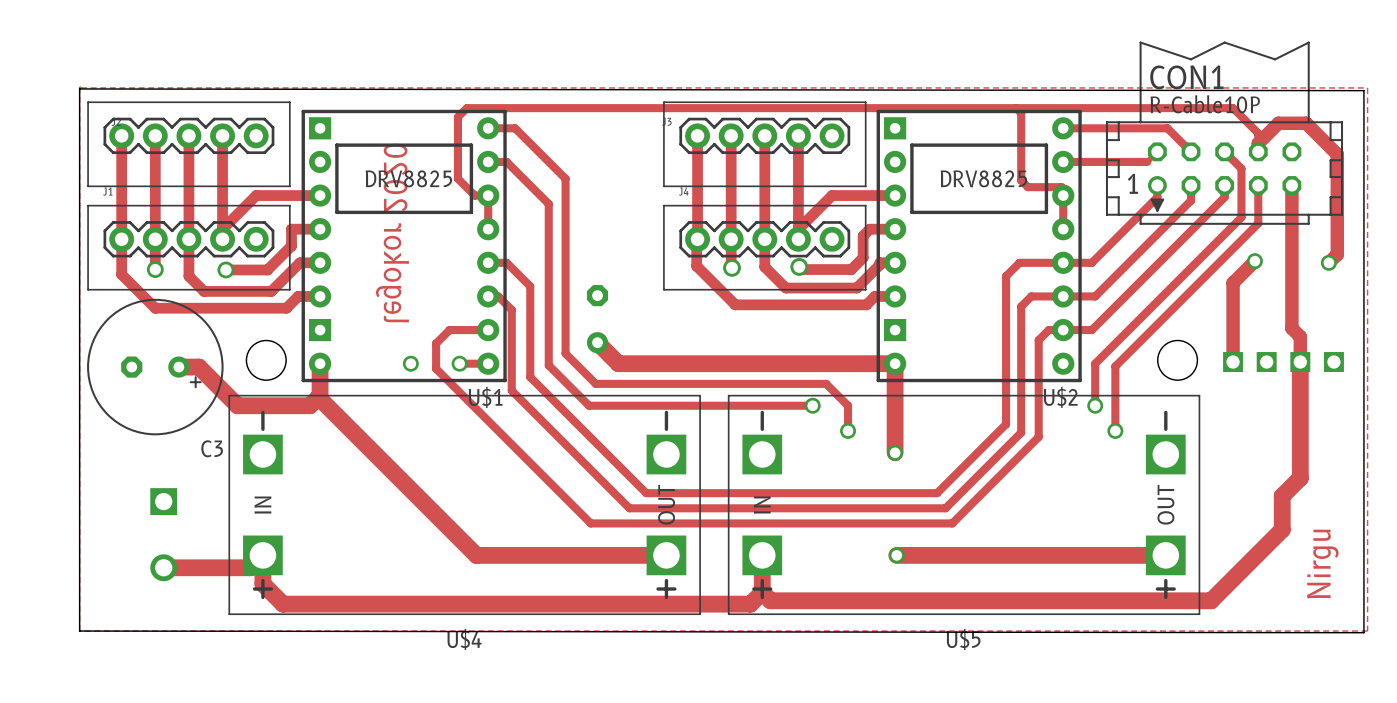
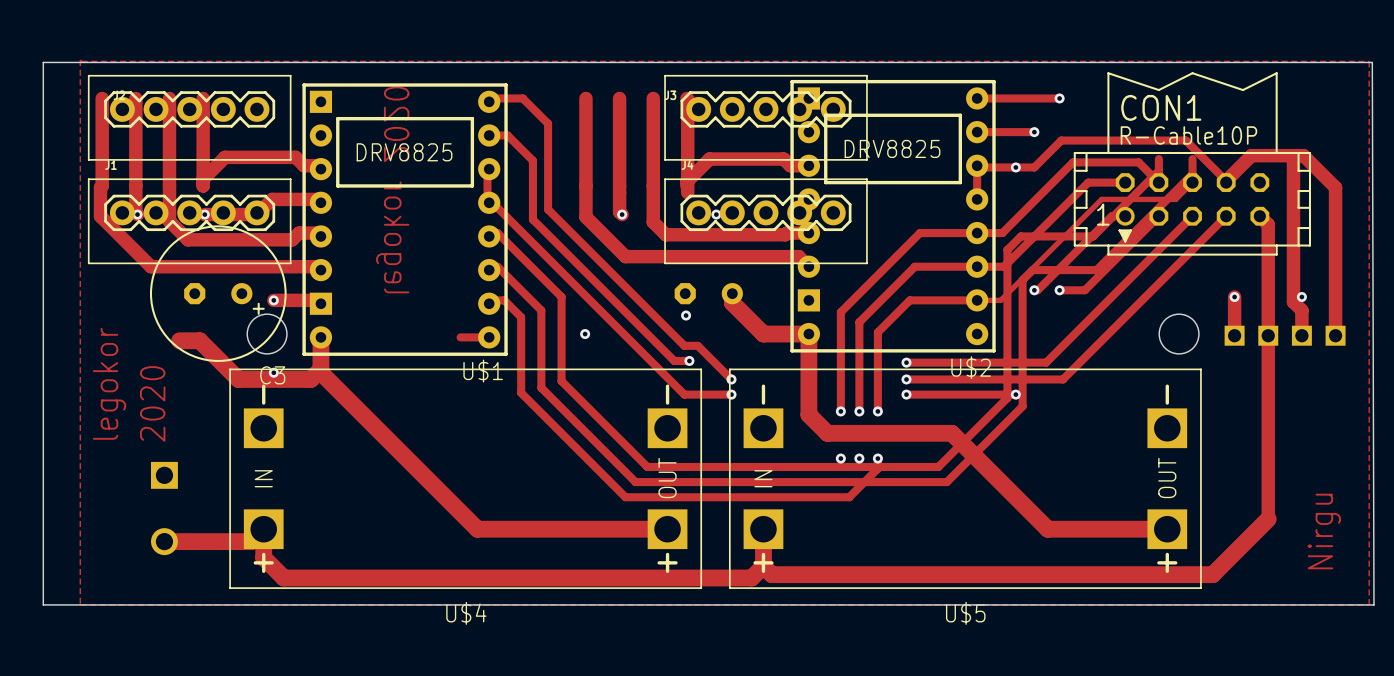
board edge: (79, 88) (1363, 90) (1363, 632) (79, 631) (79, 88) -> (43, 62) (43, 604) (1373, 604) (1372, 62) (43, 62)
track: (1016, 108) (1021, 113) (1021, 180) (1027, 187) (1061, 187) (1063, 188) (1063, 229) -> none
track: none -> (102, 98) (100, 216) (150, 266) (319, 266)
track: none -> (135, 98) (135, 212) (137, 214)
track: none -> (169, 98) (169, 221) (188, 239) (292, 239) (299, 233) (319, 233)
track: none -> (203, 98) (203, 185)
track: none -> (487, 98) (522, 98) (548, 123) (548, 209) (684, 345) (697, 345) (731, 379)
track: none -> (585, 98) (585, 217) (625, 256) (798, 256) (808, 266)
track: none -> (619, 98) (619, 212) (622, 214)
track: none -> (653, 98) (653, 222) (665, 234) (808, 233)
track: none -> (686, 98) (687, 192)
track: none -> (977, 98) (1059, 98)
via: none -> (1059, 98)
track: (488, 128) (515, 128) (565, 178) (565, 353) (595, 383) (826, 383) (848, 405) (848, 430) -> none
track: (1063, 128) (1167, 128) (1191, 151) -> none
CON1 position: (1224, 133) -> (1192, 163)
track: (121, 135) (121, 274) (155, 308) (286, 308) (298, 296) (320, 296) -> none
track: (155, 135) (155, 269) -> none
track: (188, 135) (188, 276) (204, 291) (271, 291) (299, 262) (320, 262) -> none
track: (222, 135) (222, 239) -> none
track: (697, 135) (696, 266) (735, 304) (866, 304) (874, 296) (895, 296) -> none
track: (731, 135) (732, 267) -> none
track: (764, 135) (764, 267) (785, 288) (856, 288) (879, 262) (895, 262) -> none
track: (798, 135) (798, 239) -> none
track: (1157, 151) (1147, 161) (1063, 161) -> none
track: (1224, 151) (1241, 168) (1241, 217) (1095, 363) (1095, 405) -> none
track: none -> (977, 132) (1034, 132)
via: none -> (1034, 132)
track: (1224, 185) (1224, 197) (1091, 330) (1048, 330) (1038, 340) (1038, 437) (952, 523) (848, 523) -> (877, 458) (877, 468) (849, 497)
track: (1258, 185) (1258, 223) (1115, 366) (1115, 430) -> none
track: (531, 187) (548, 203) (548, 365) (589, 405) (812, 405) -> (532, 160) (532, 219) (674, 360) (689, 360)
track: none -> (319, 165) (304, 165) (295, 157) (225, 157) (203, 179)
track: none -> (487, 165) (487, 199) (684, 394) (731, 394)
track: none -> (808, 165) (790, 165) (783, 159) (709, 159) (686, 181) (686, 185)
via: none -> (1015, 167)
track: (320, 195) (256, 195) (222, 229) -> none
track: (895, 195) (832, 195) (798, 229) -> none
track: none -> (1226, 180) (1251, 155) (1303, 155) (1335, 187) (1335, 335)
track: none -> (1226, 180) (1185, 140) (1061, 140) (1034, 167) (978, 167) (977, 165) (977, 199)
track: none -> (1125, 182) (1088, 182) (1004, 266) (914, 266) (859, 322) (859, 411)
track: none -> (1158, 182) (1138, 162) (1073, 162) (1002, 233) (919, 233) (840, 312) (840, 411)
track: none -> (1192, 182) (1175, 199) (1101, 199) (1000, 300) (909, 300) (877, 332) (877, 411)
track: none -> (319, 199) (272, 199) (257, 214) (204, 214)
track: (320, 229) (291, 229) (291, 246) (267, 269) (225, 269) -> none
track: (489, 229) (488, 229) (488, 195) (474, 195) (457, 178) (457, 117) (466, 108) (1233, 108) (1258, 133) (1258, 151) (1258, 143) (1278, 123) (1306, 123) (1337, 154) (1337, 254) (1328, 262) -> none
track: (895, 229) (869, 229) (863, 235) (863, 257) (851, 269) (800, 269) (799, 266) -> none
via: none -> (137, 214)
via: none -> (204, 214)
via: none -> (622, 214)
via: none -> (716, 214)
track: none -> (1125, 216) (1111, 216) (1037, 290) (1034, 290)
track: none -> (1158, 216) (1084, 290) (1059, 290)
track: none -> (1192, 216) (1046, 362) (906, 362)
track: none -> (1226, 216) (1062, 379) (906, 379)
U$2 position: (979, 246) -> (893, 216)
track: (1254, 261) (1233, 283) (1233, 323) -> none
via: (1254, 261) -> none
track: (488, 262) (506, 262) (530, 286) (530, 377) (560, 407) -> (487, 233) (497, 233) (561, 297) (561, 381)
via: (1328, 262) -> none
via: (799, 266) -> none
via: (732, 267) -> none
via: (155, 269) -> none
via: (225, 269) -> none
track: (488, 296) (498, 296) (511, 309) (511, 390) (629, 508) (634, 508) -> (487, 266) (497, 266) (541, 310) (541, 387) (635, 482)
via: none -> (1034, 290)
via: none -> (1059, 290)
part rotation: 0° (597, 319) -> 90° counterclockwise (708, 293)
part position: (597, 319) -> (708, 293)
via: none -> (1234, 297)
via: none -> (1301, 297)
track: none -> (273, 300) (319, 300)
via: none -> (273, 300)
track: (488, 330) (449, 330) (436, 343) (436, 368) (590, 523) (624, 523) -> (487, 300) (504, 300) (521, 317) (521, 392) (625, 497)
via: none -> (686, 315)
track: (597, 342) (618, 363) (895, 363) (895, 452) -> none
via: none -> (585, 334)
track: (1300, 362) (1300, 478) (1282, 496) (1282, 529) (1266, 545) -> (1259, 216) (1268, 224) (1268, 519)
via: (410, 363) -> none
via: (459, 363) -> none
C3 position: (155, 367) -> (218, 293)
via: none -> (689, 360)
via: none -> (906, 362)
via: none -> (273, 372)
via: none -> (731, 379)
via: (812, 405) -> none
via: none -> (906, 379)
via: (1095, 405) -> none
text: none -> legokor (109, 383)
via: none -> (731, 394)
track: none -> (906, 394) (1015, 394)
via: none -> (906, 394)
via: none -> (1015, 394)
via: (848, 430) -> none
via: (1115, 430) -> none
text: none -> 2020 (152, 403)
via: none -> (840, 411)
via: none -> (859, 411)
via: none -> (877, 411)
via: (895, 452) -> none
via: none -> (840, 458)
via: none -> (859, 458)
via: none -> (877, 458)
track: (896, 555) (1046, 555) -> (732, 293) (732, 302) (763, 334) (808, 334) (808, 414) (827, 433) (951, 433) (1047, 529)
via: (896, 555) -> none

